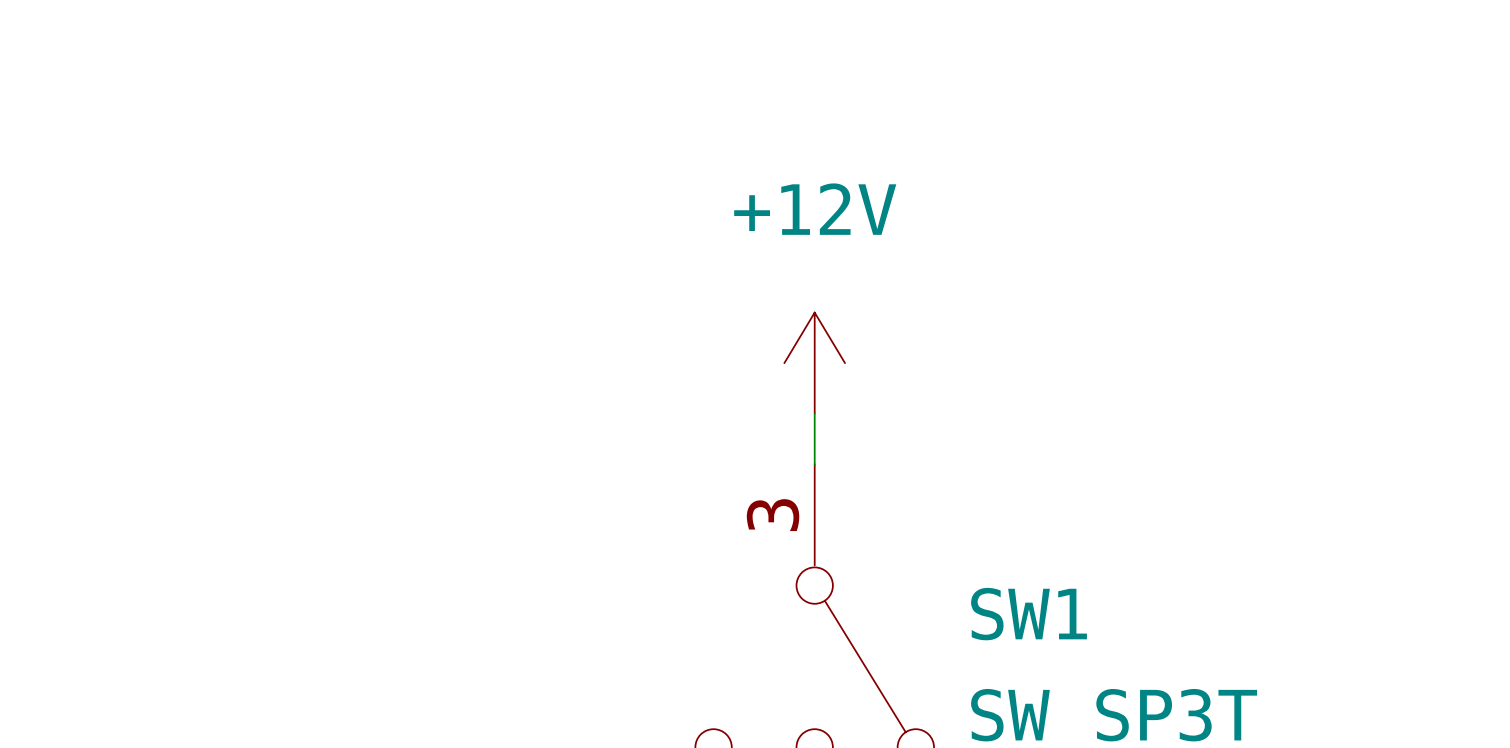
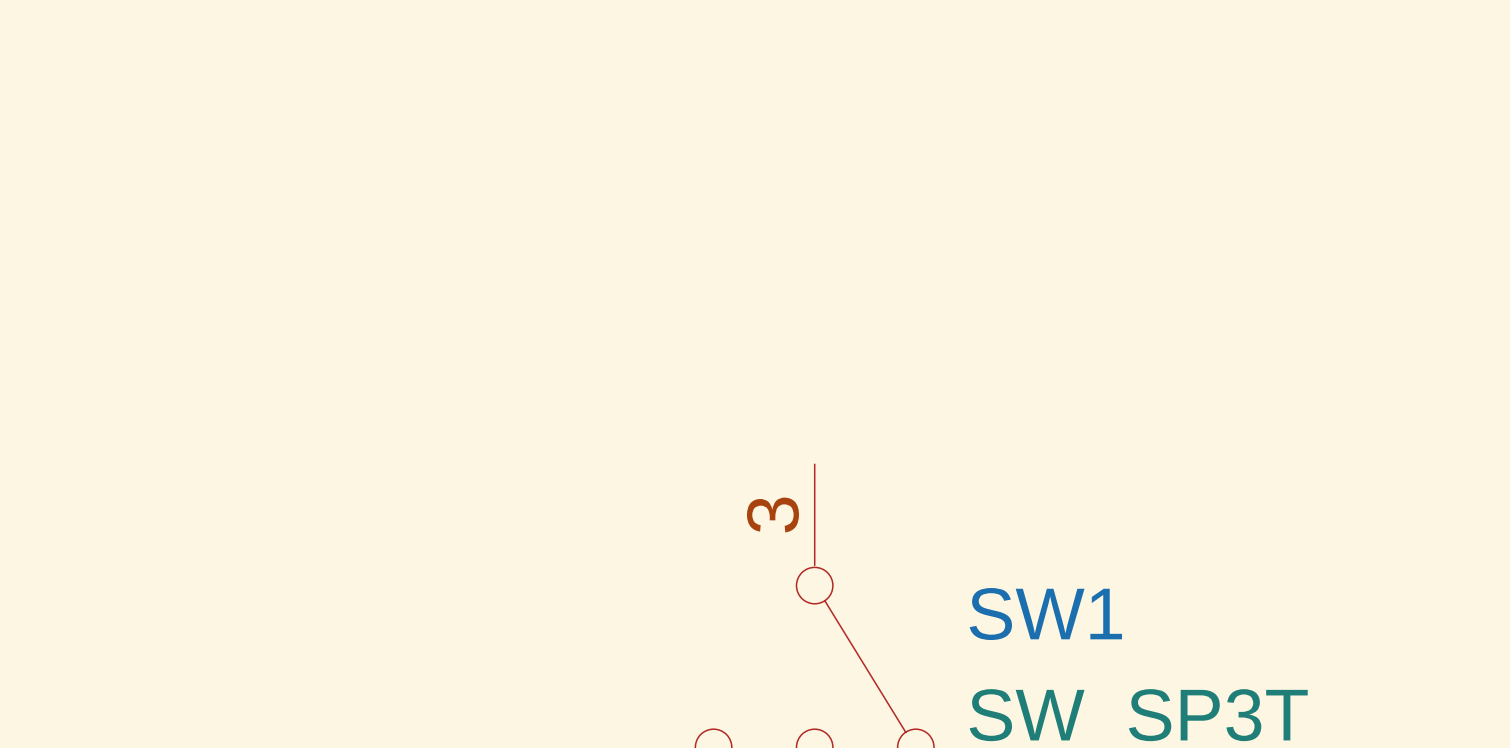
power symbol: +12V (814, 363) -> none
wire: (814, 413) (814, 464) -> none

